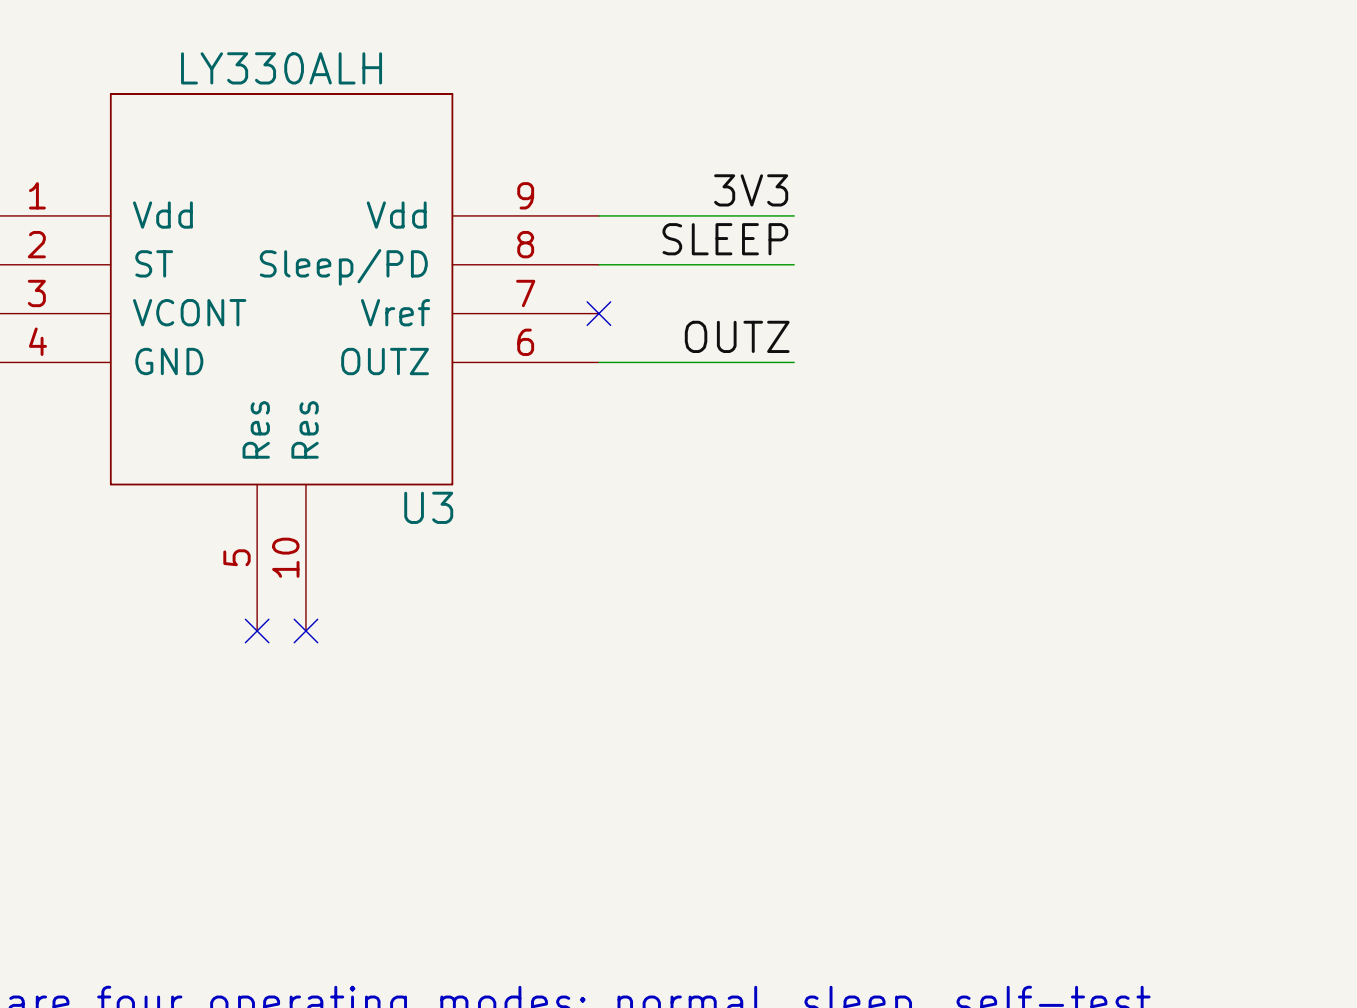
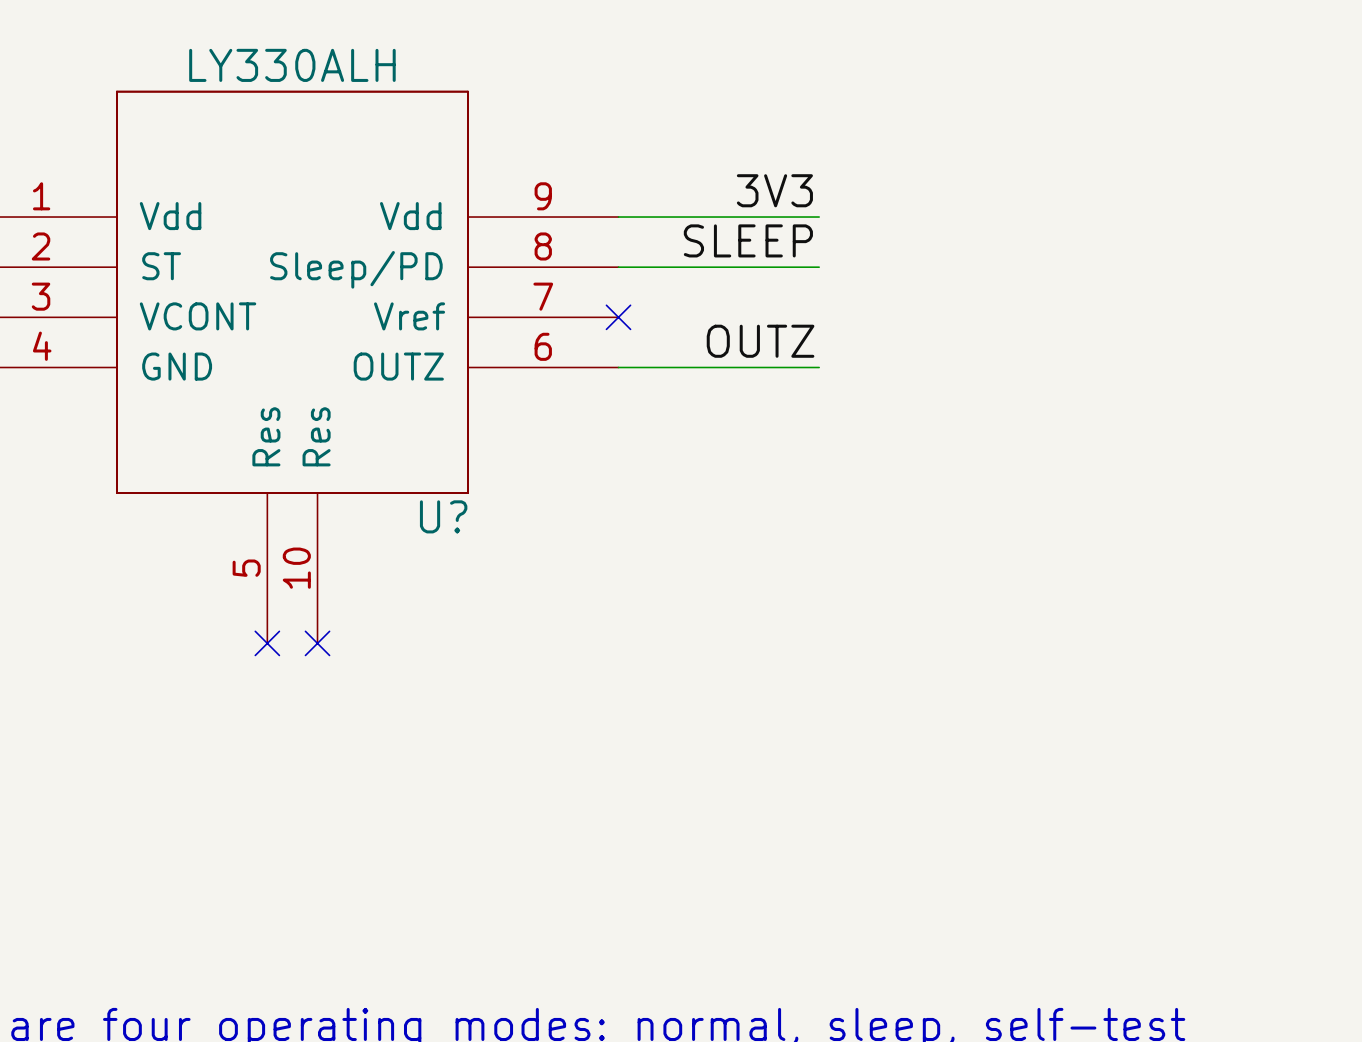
U3 name: U3 (428, 507) -> U? (443, 516)

